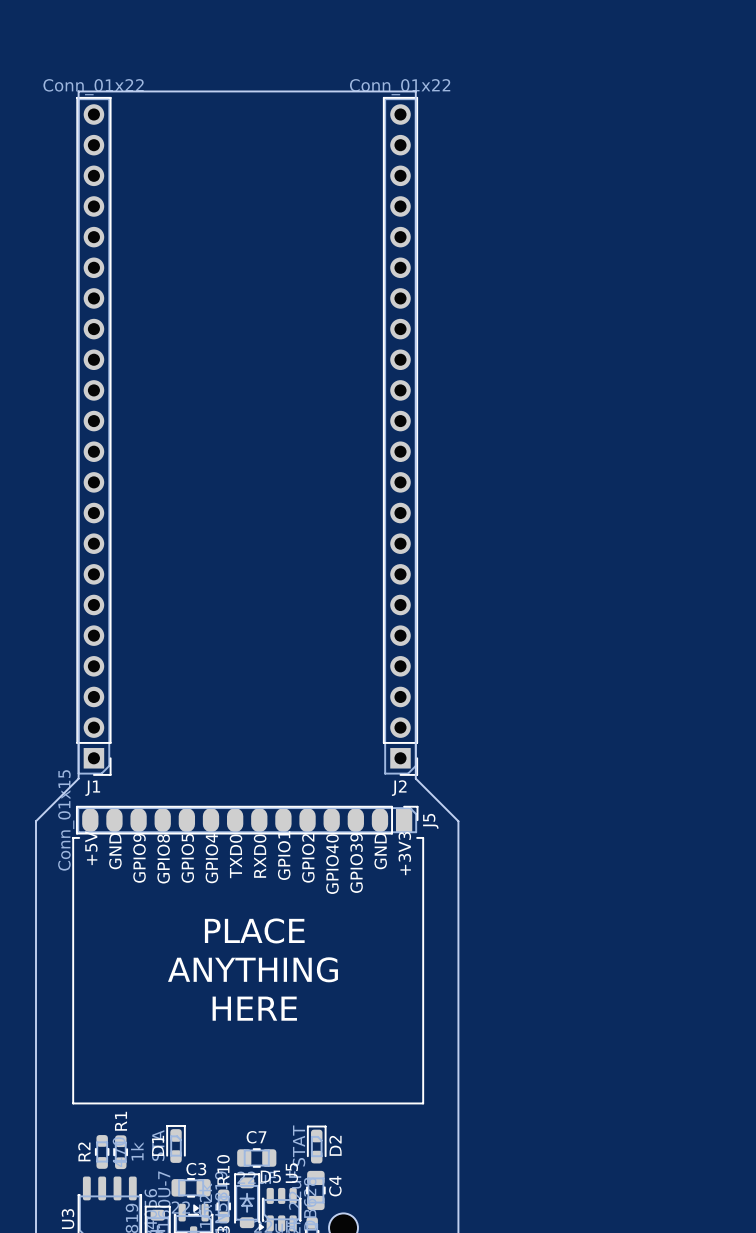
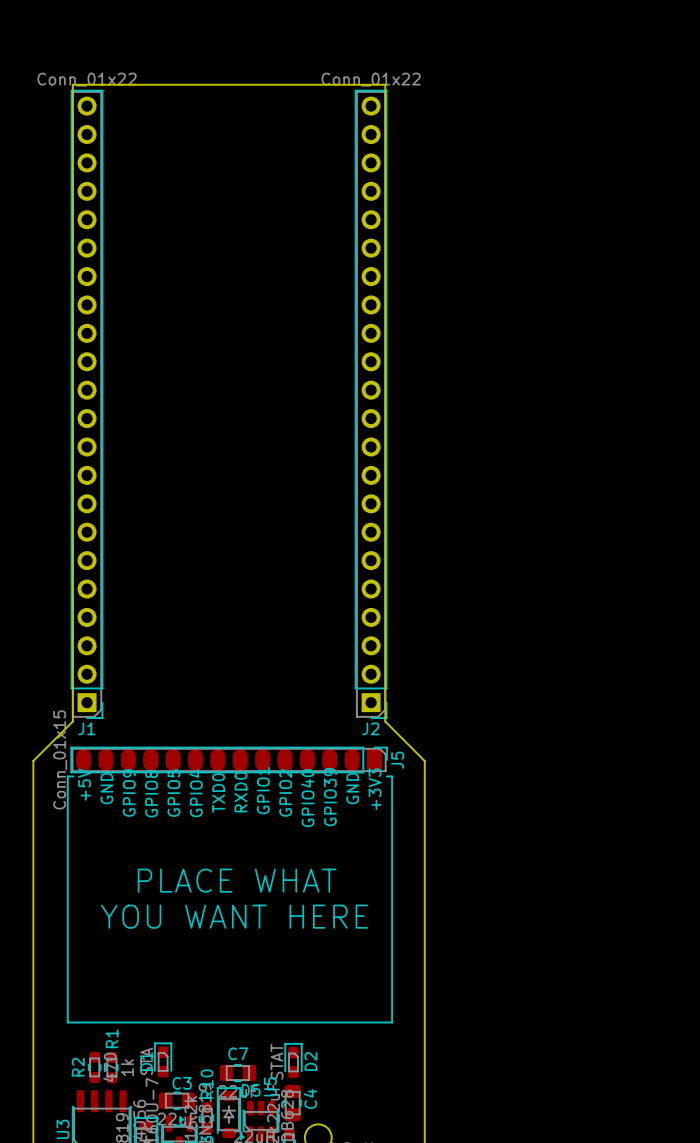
text: PLACE (254, 930) -> PLACE WHAT (237, 880)
text: ANYTHING (252, 969) -> none
text: none -> YOU WANT HERE (234, 916)
text: HERE (254, 1008) -> none

